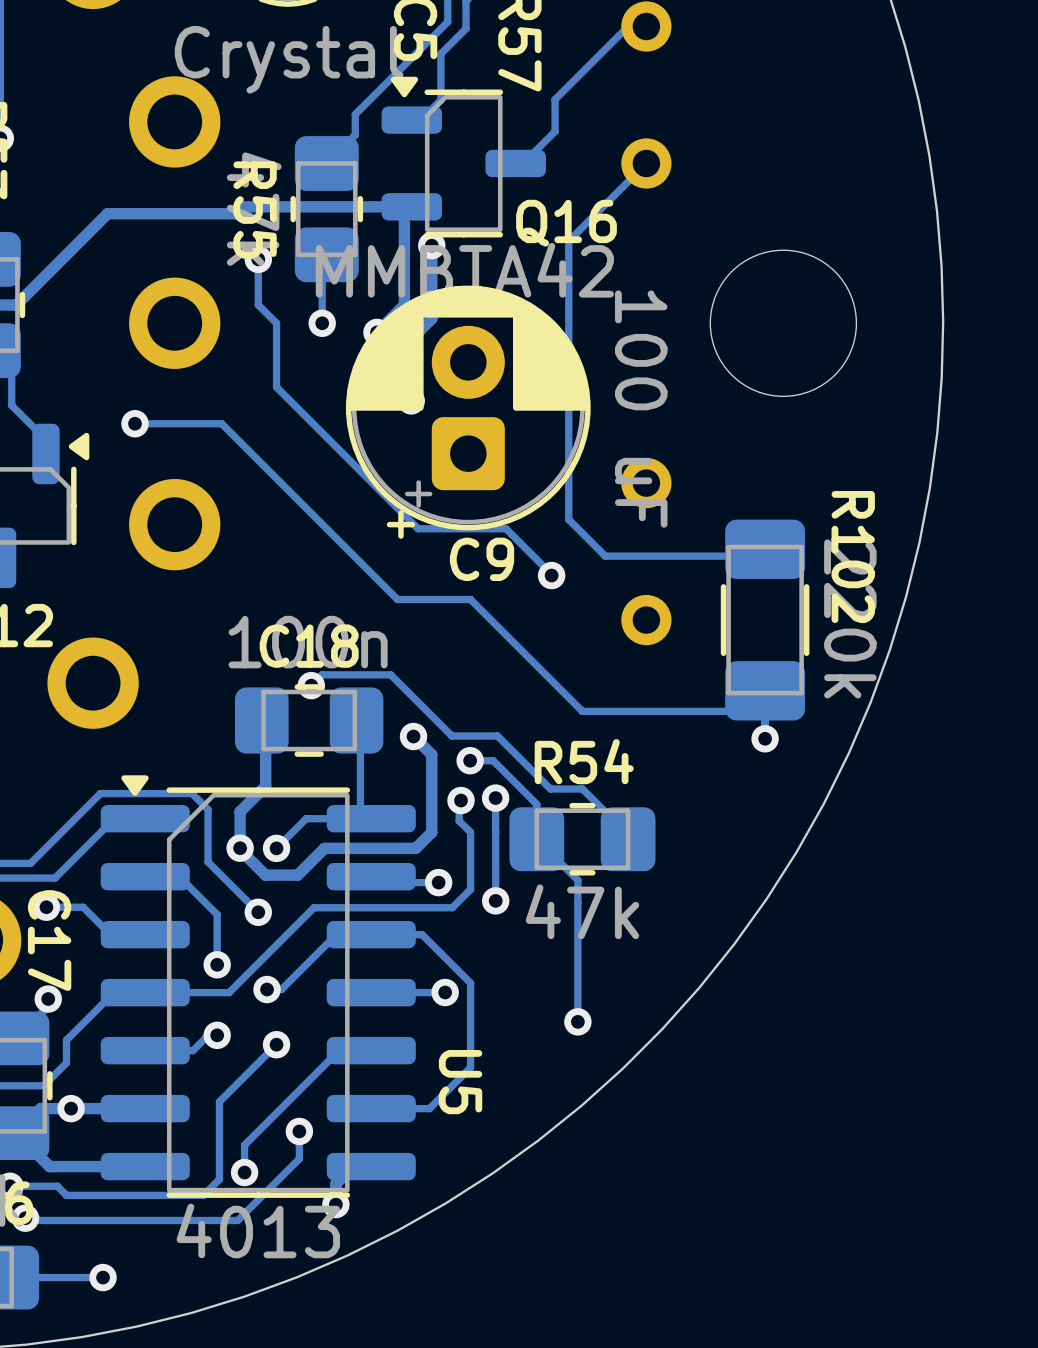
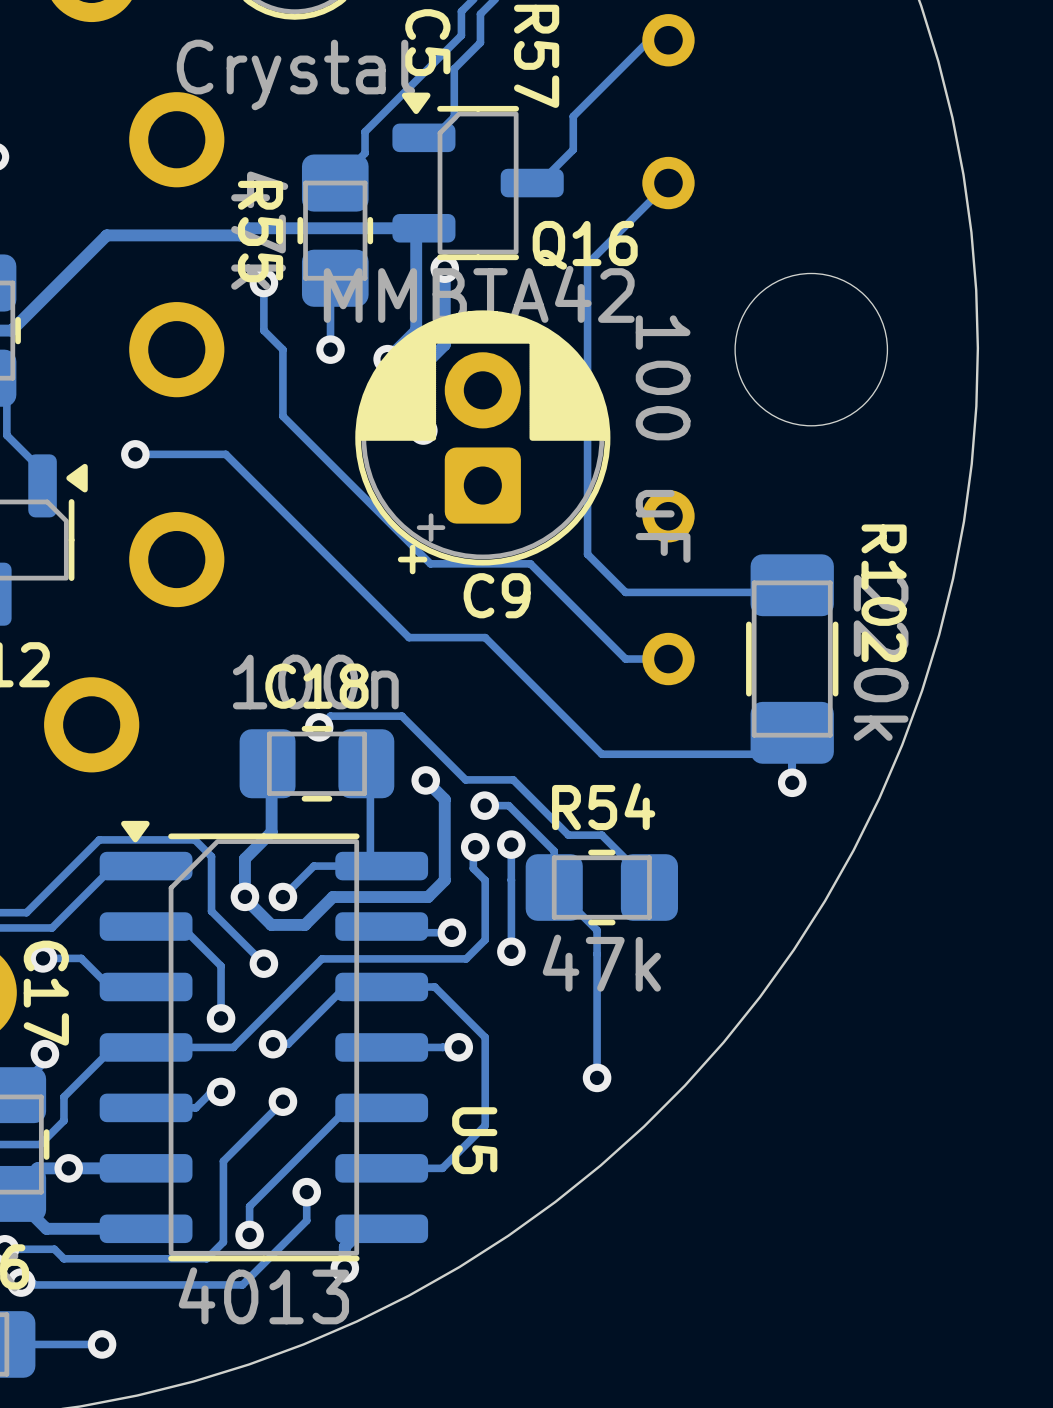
track: (505, 528) (555, 577) -> (522, 563) (530, 563) (625, 659) (668, 659)
via: (551, 575) -> none

